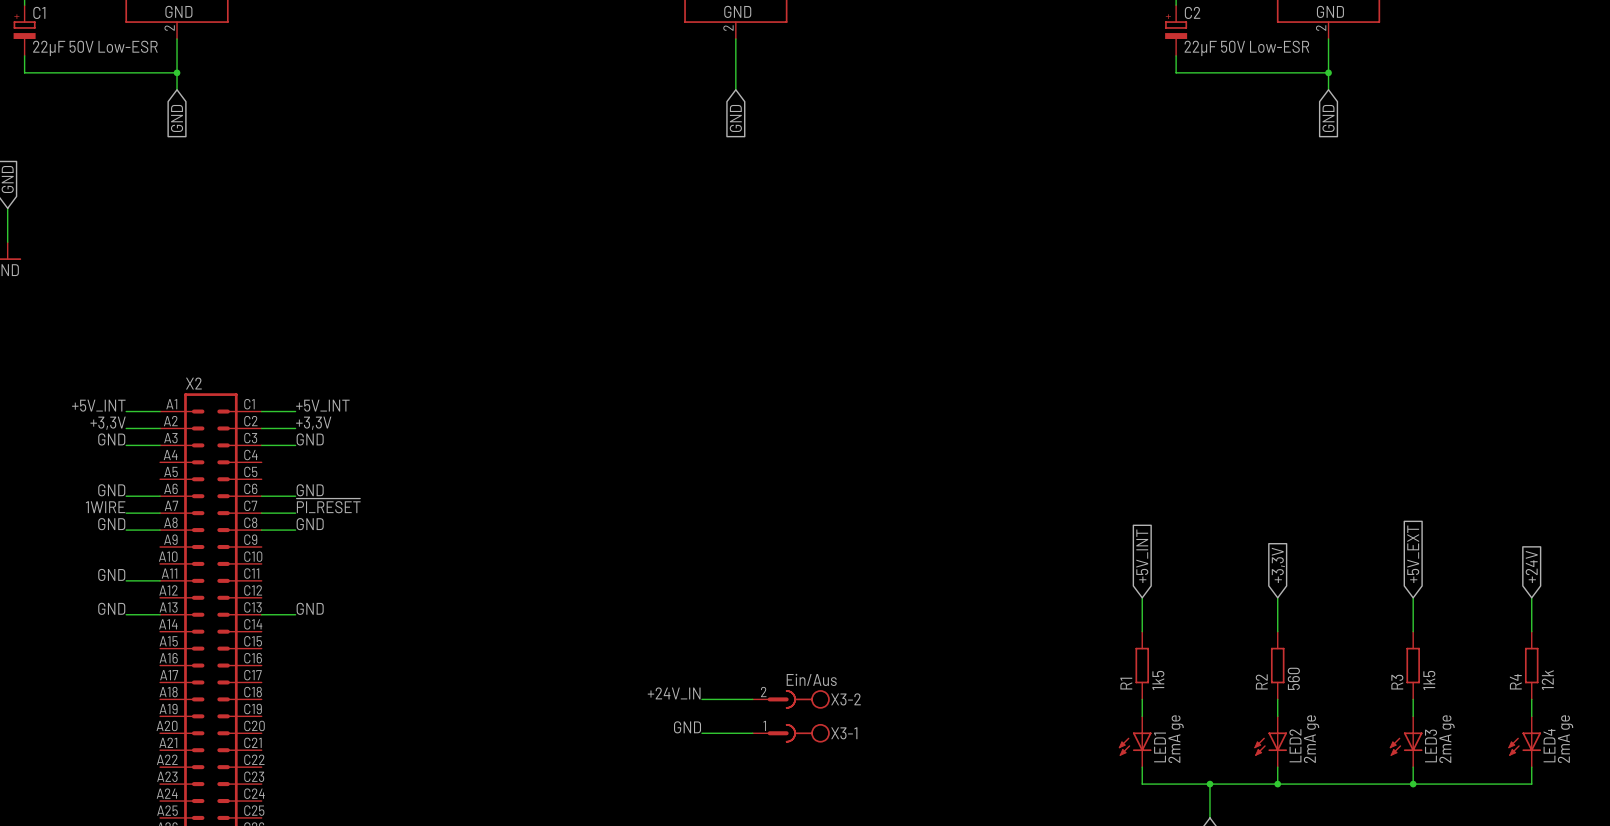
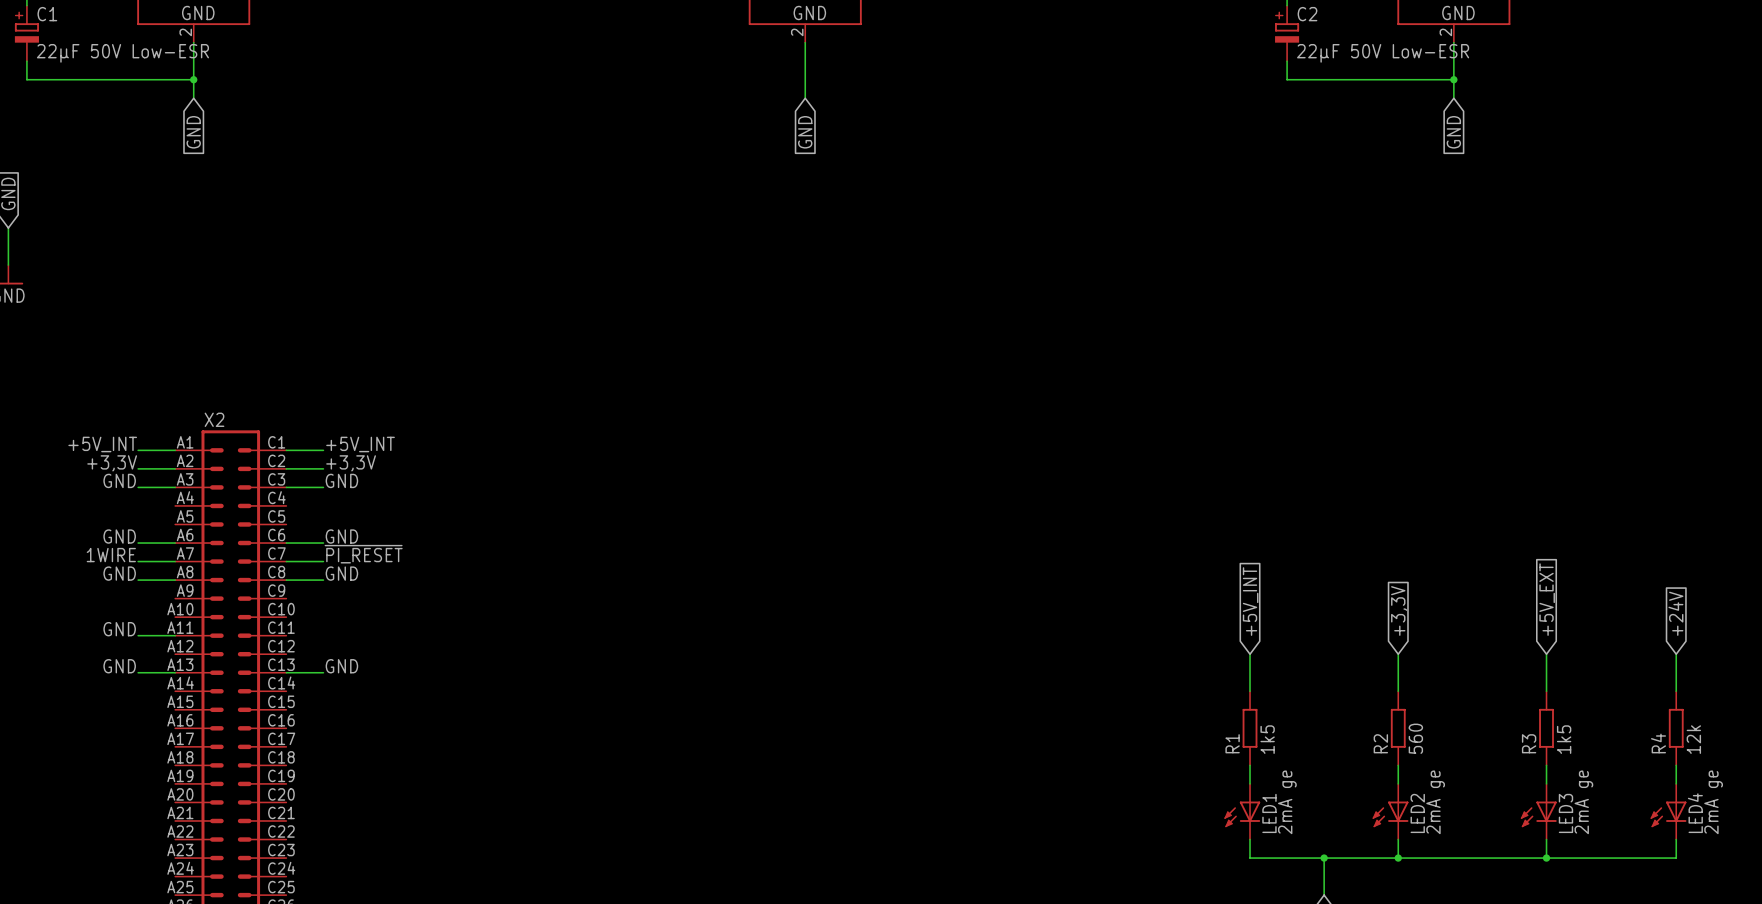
label: +24V_IN (674, 693) -> none
wire: (701, 699) (752, 699) -> none
X3-2: Ein/Aus (791, 699) -> none
label: GND (687, 727) -> none
wire: (701, 733) (752, 733) -> none
X3-1: (791, 733) -> none

